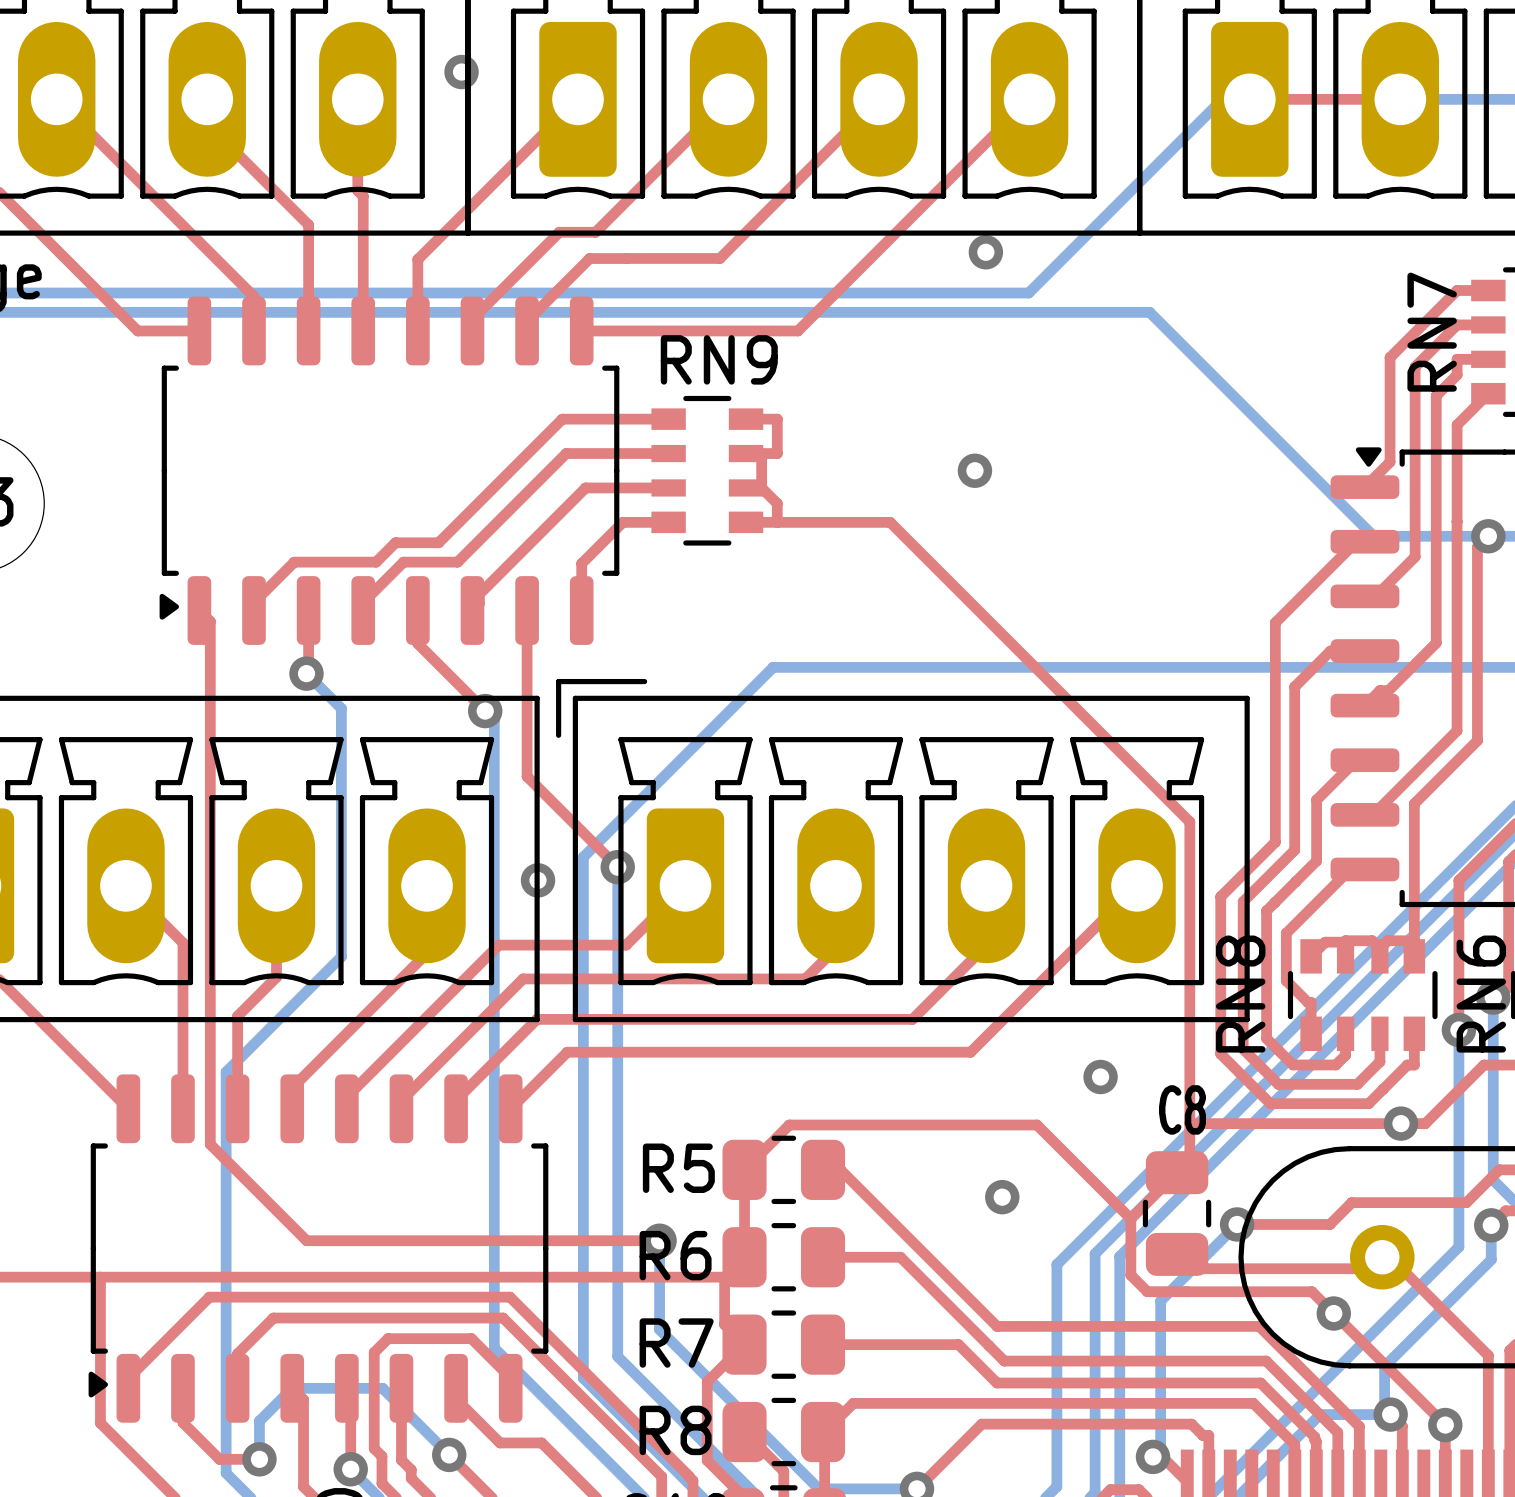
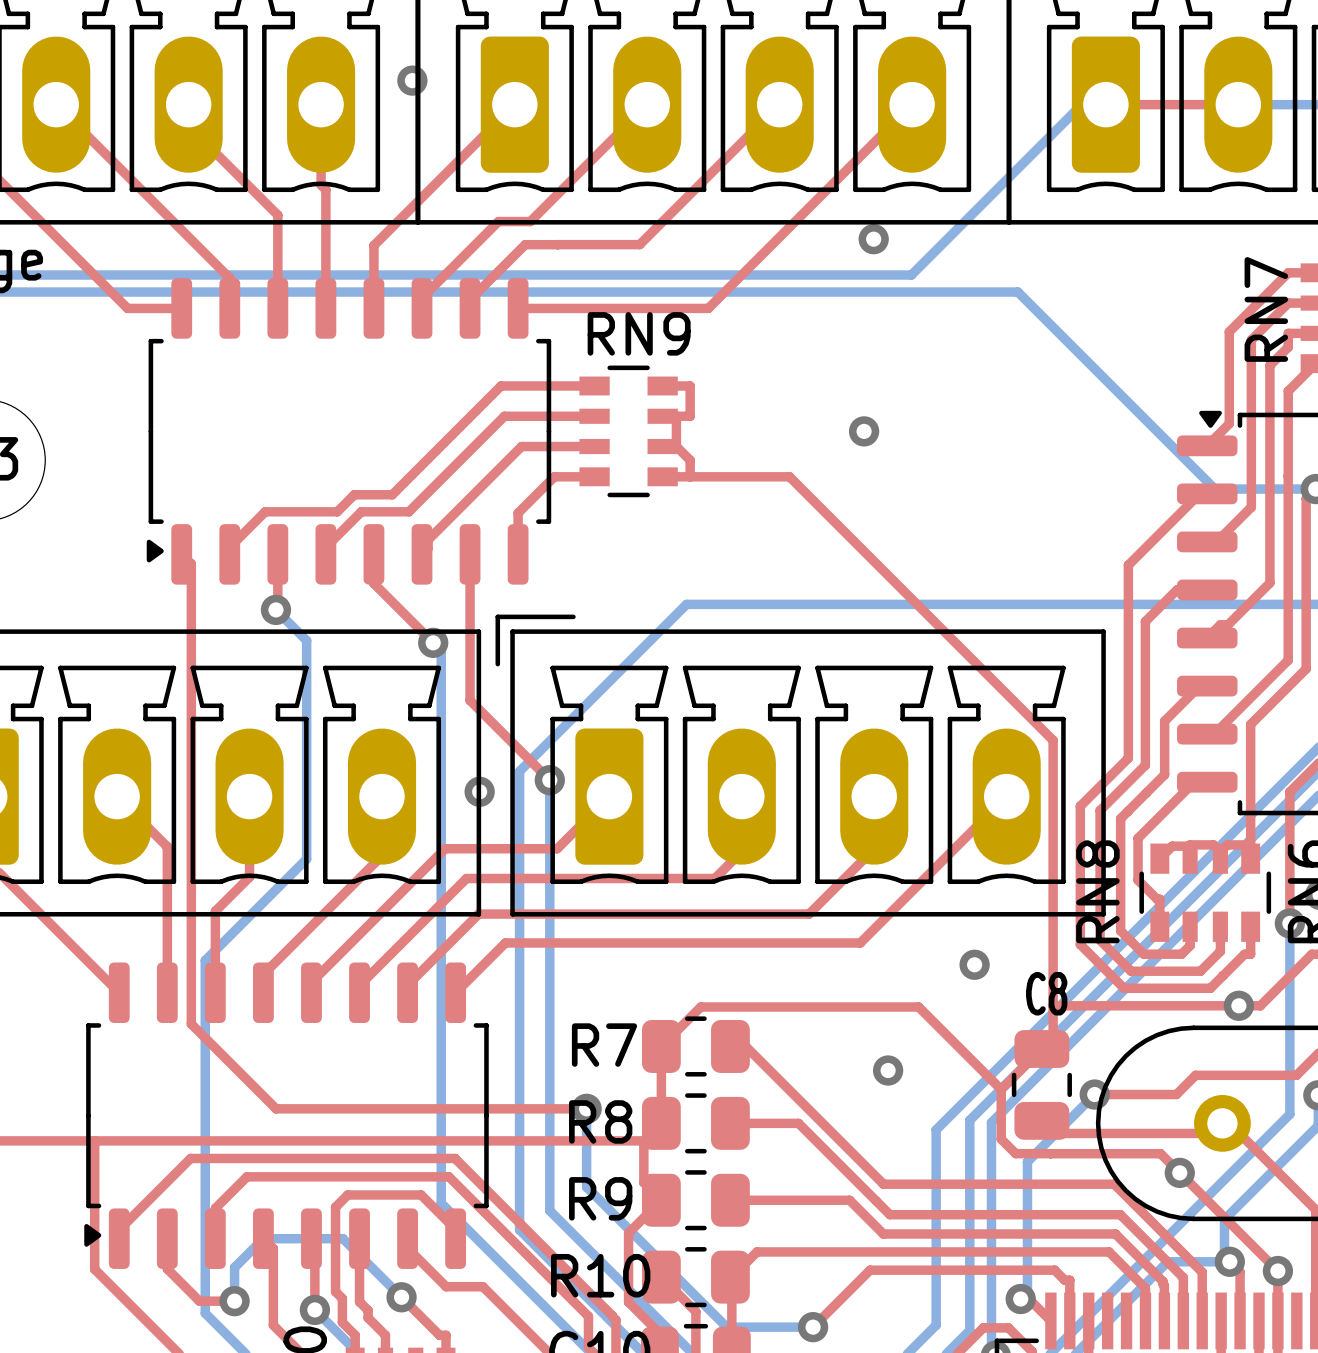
R5 name: R5 (678, 1168) -> R7 (604, 1045)
R6 name: R6 (675, 1255) -> R8 (600, 1121)
R7 name: R7 (676, 1343) -> R9 (600, 1198)
R8 name: R8 (675, 1430) -> R10 (600, 1275)

